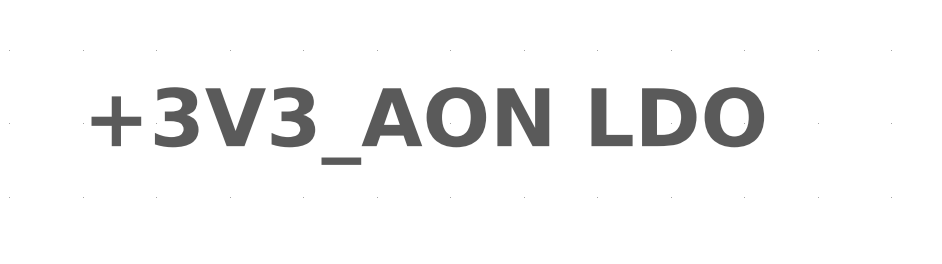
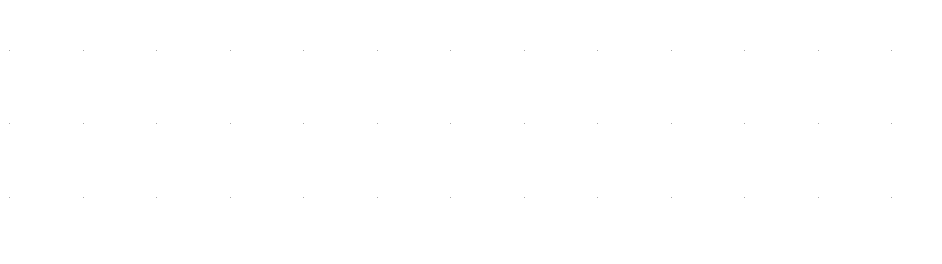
text: +3V3_AON LDO (427, 126) -> none

